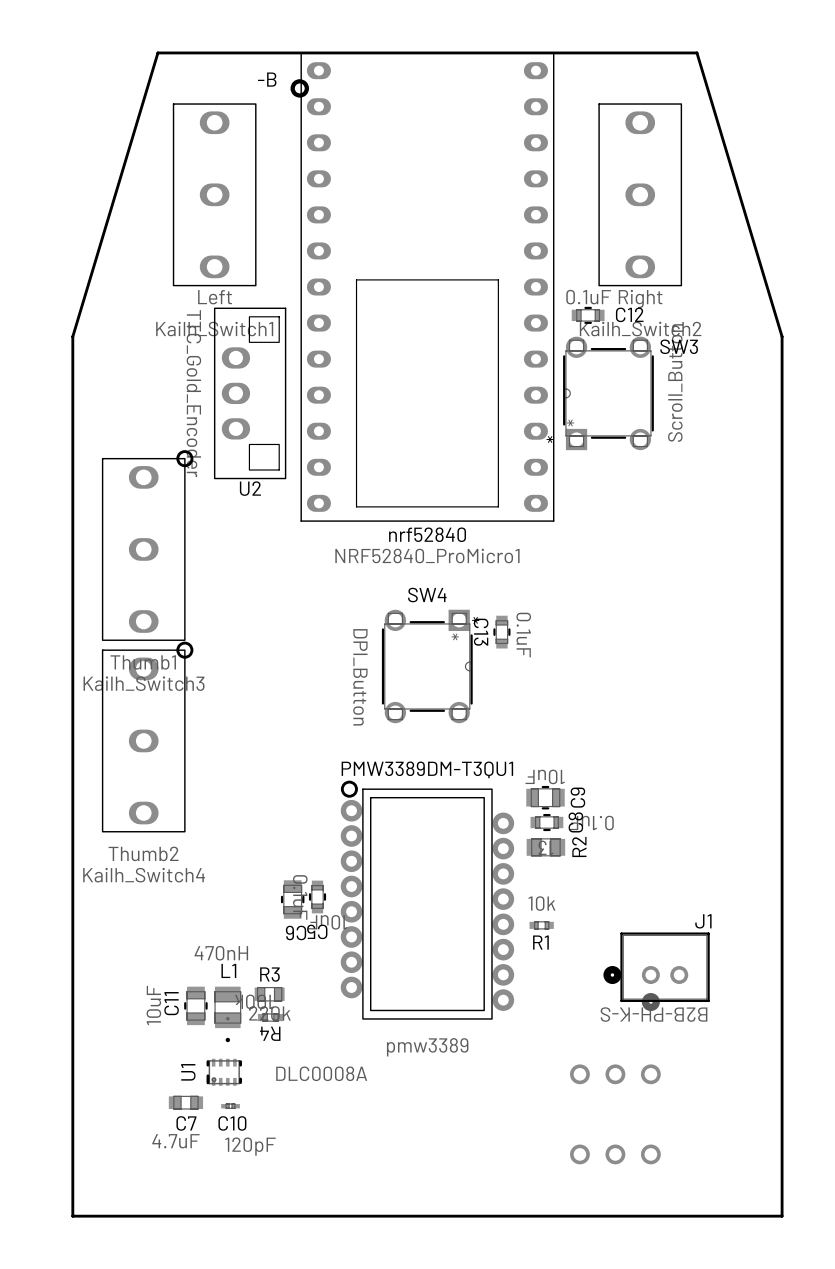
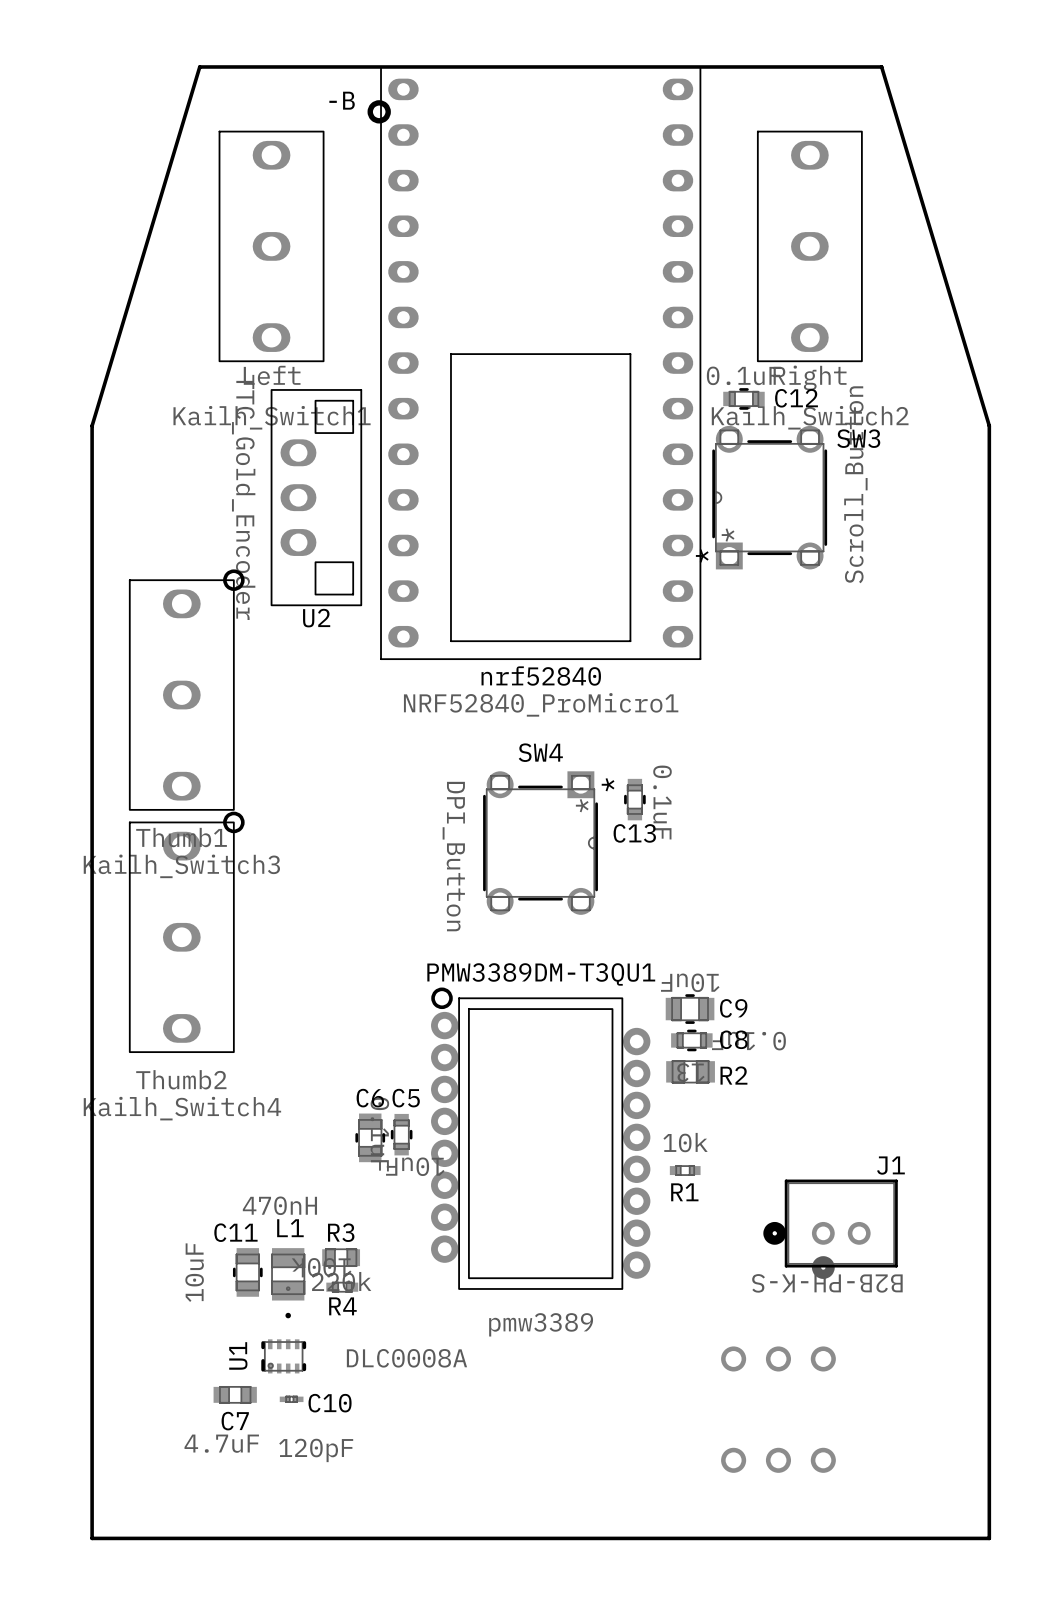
C13 name rotation: 0° (481, 632) -> 90° counterclockwise (634, 833)
C9 name rotation: 0° (577, 797) -> 90° clockwise (733, 1008)
C8 name rotation: 0° (575, 822) -> 90° clockwise (733, 1039)
R2 name rotation: 0° (579, 846) -> 90° clockwise (733, 1075)
C5 name rotation: 0° (317, 931) -> 180° (406, 1098)
C5 name position: C5 (317, 931) -> C5 (406, 1098)
C6 name rotation: 0° (296, 932) -> 180° (370, 1098)
C6 name position: C6 (296, 932) -> C6 (370, 1098)
C11 name rotation: 0° (171, 1003) -> 90° clockwise (235, 1232)
R4 name rotation: 0° (270, 1033) -> 180° (342, 1306)
C10 name position: C10 (232, 1123) -> C10 (330, 1403)

